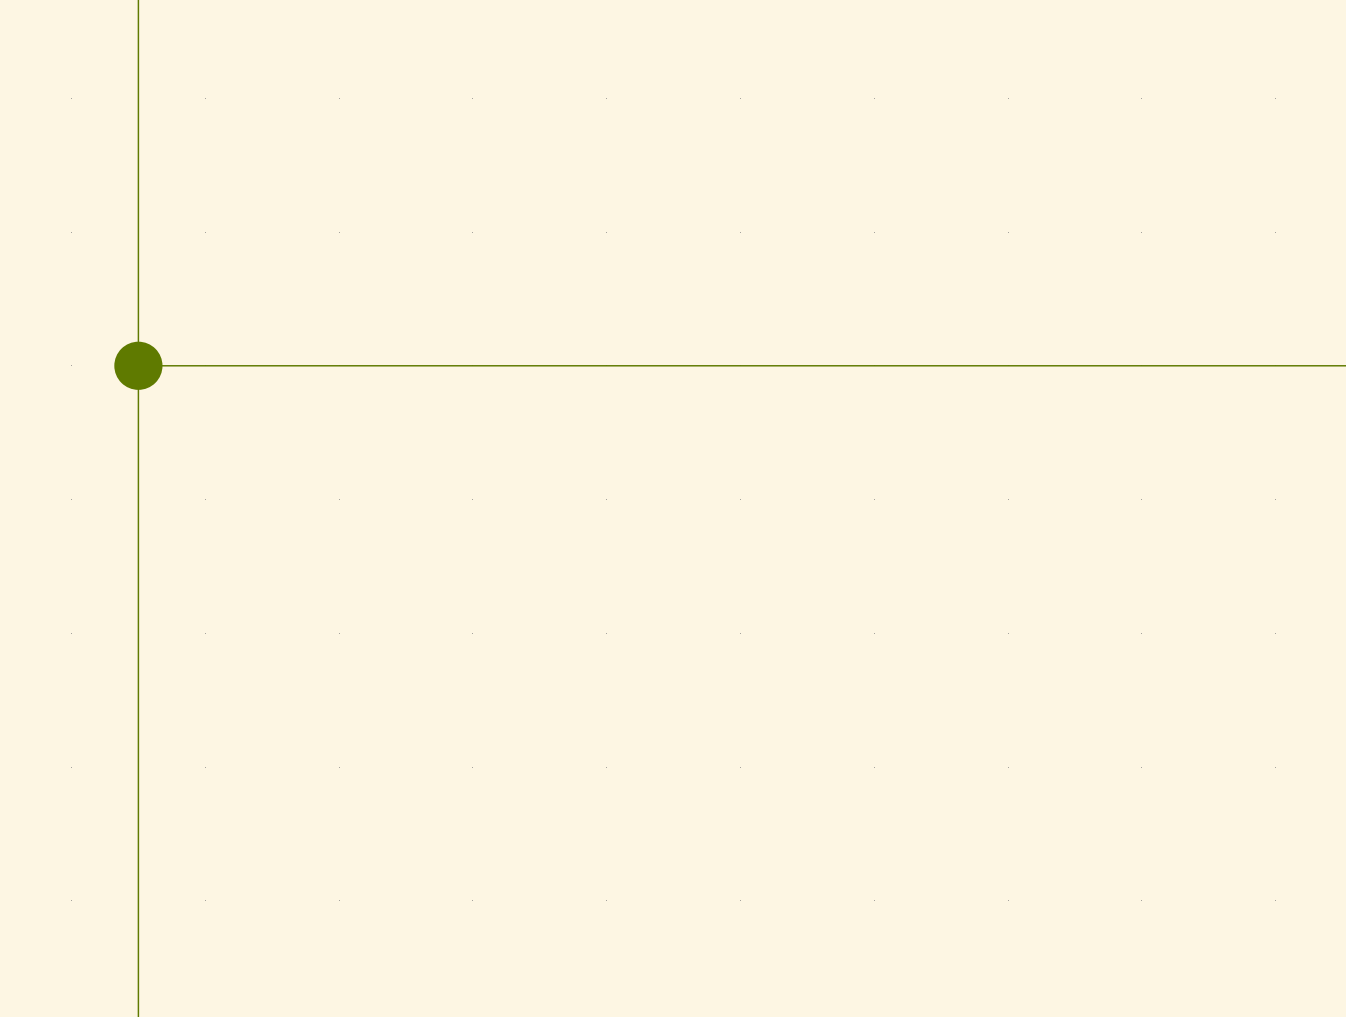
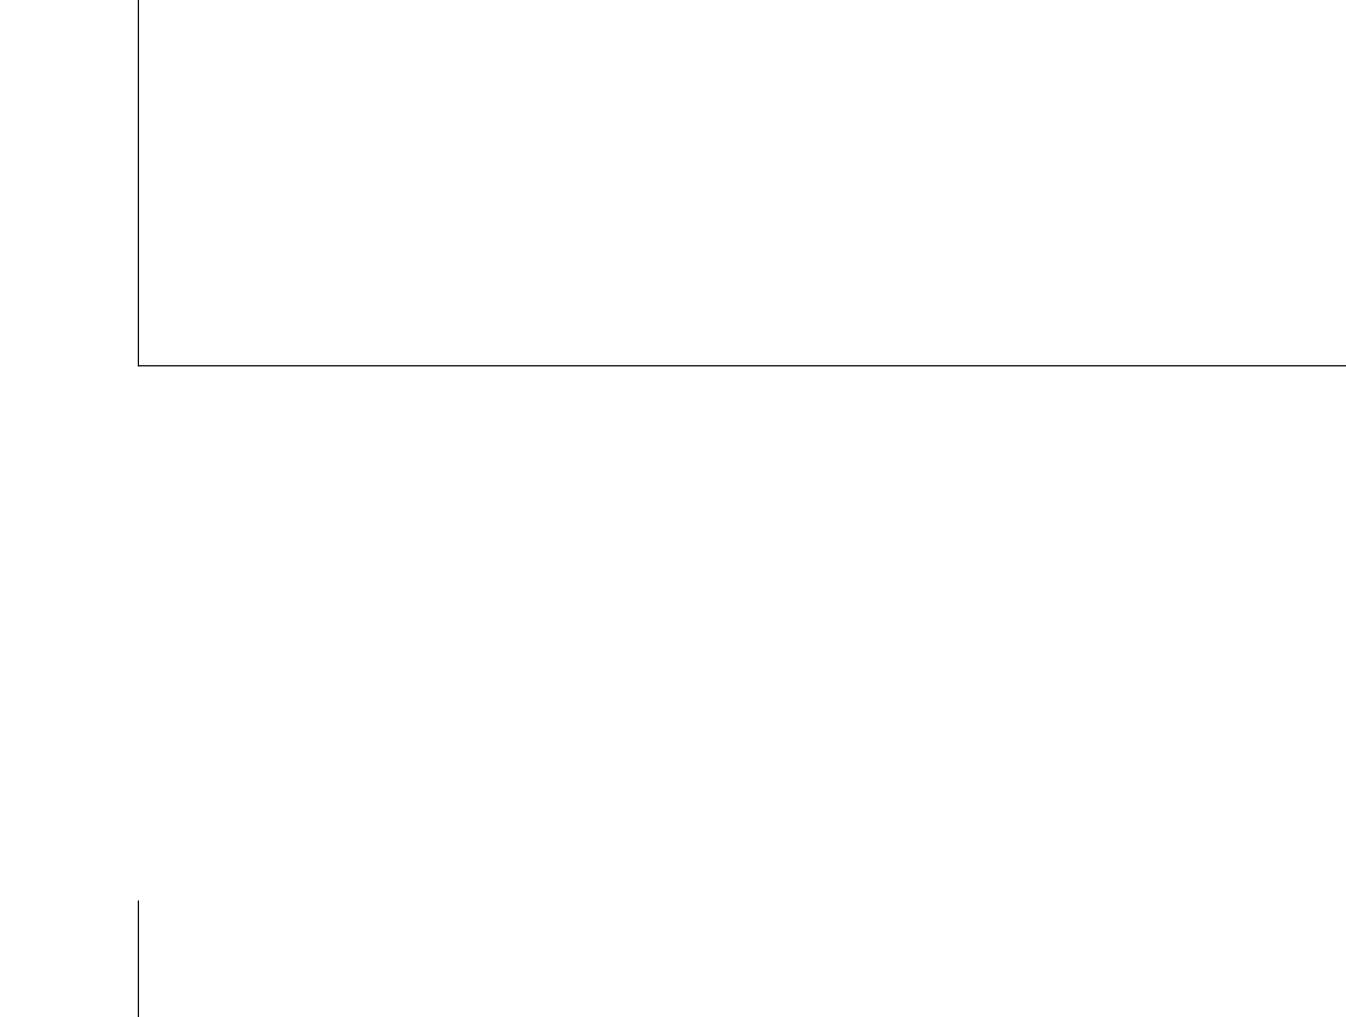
wire: (138, 365) (138, 900) -> none
junction: (138, 365) -> none

